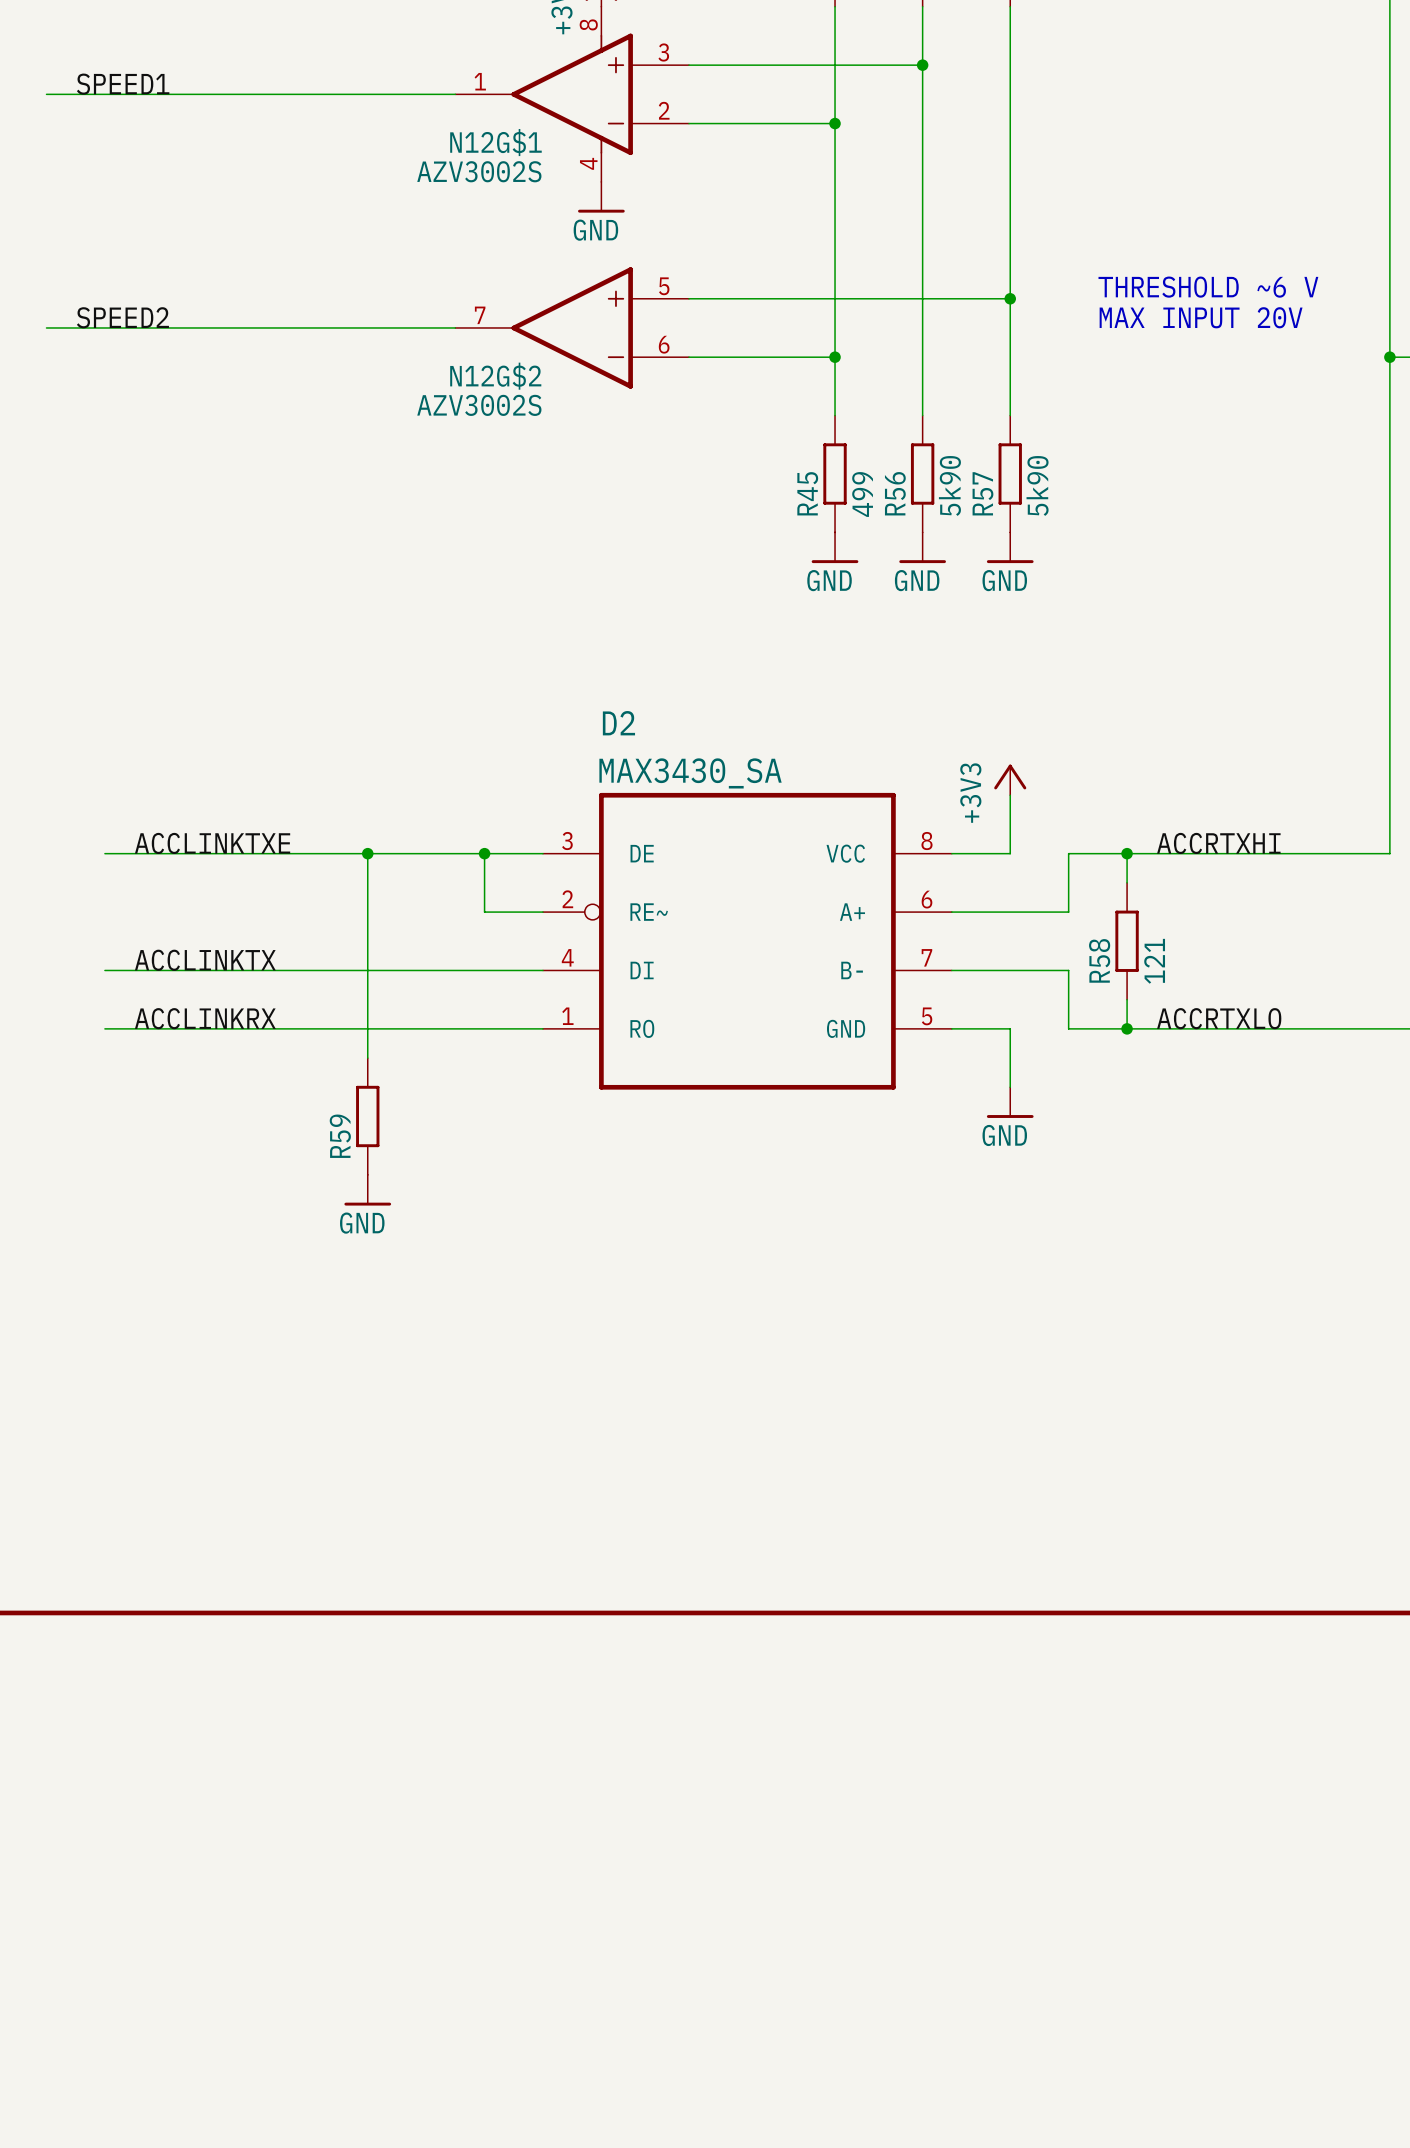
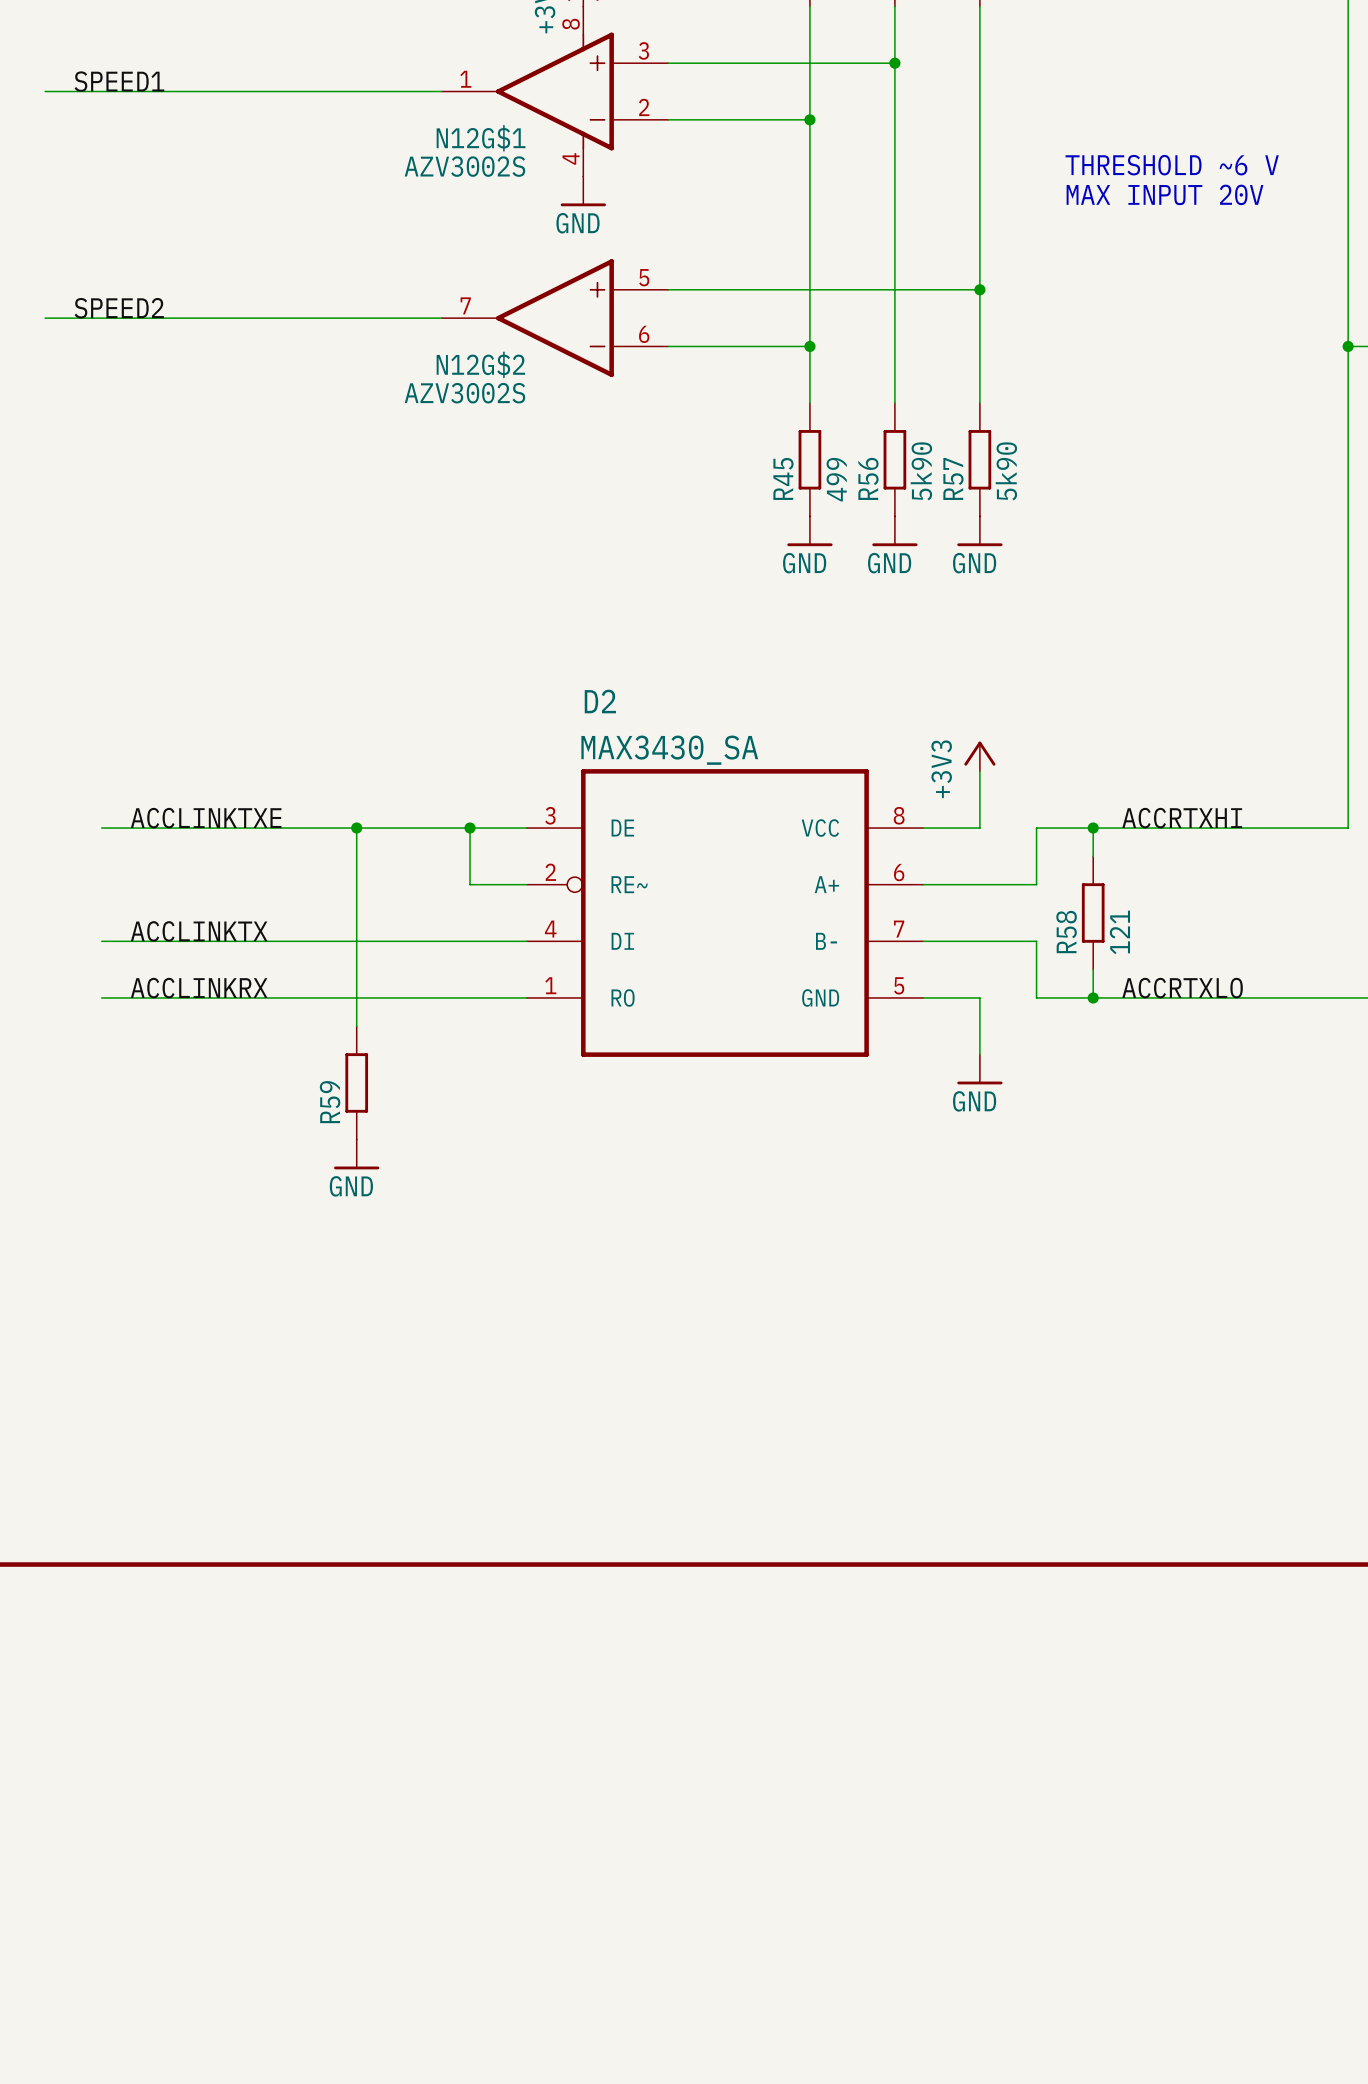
text position: THRESHOLD ~6 V (1208, 287) -> THRESHOLD ~6 V (1172, 165)
text position: MAX INPUT 20V (1201, 317) -> MAX INPUT 20V (1165, 194)

